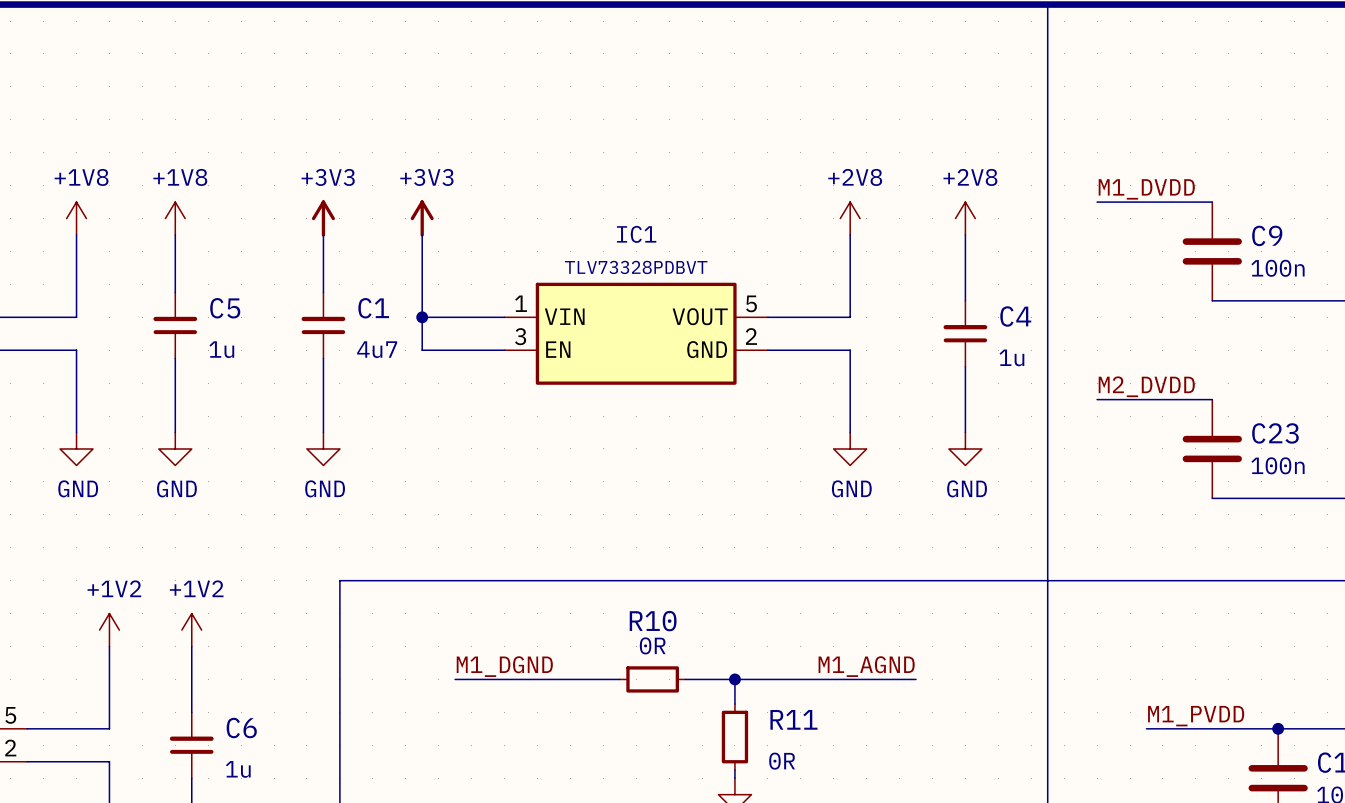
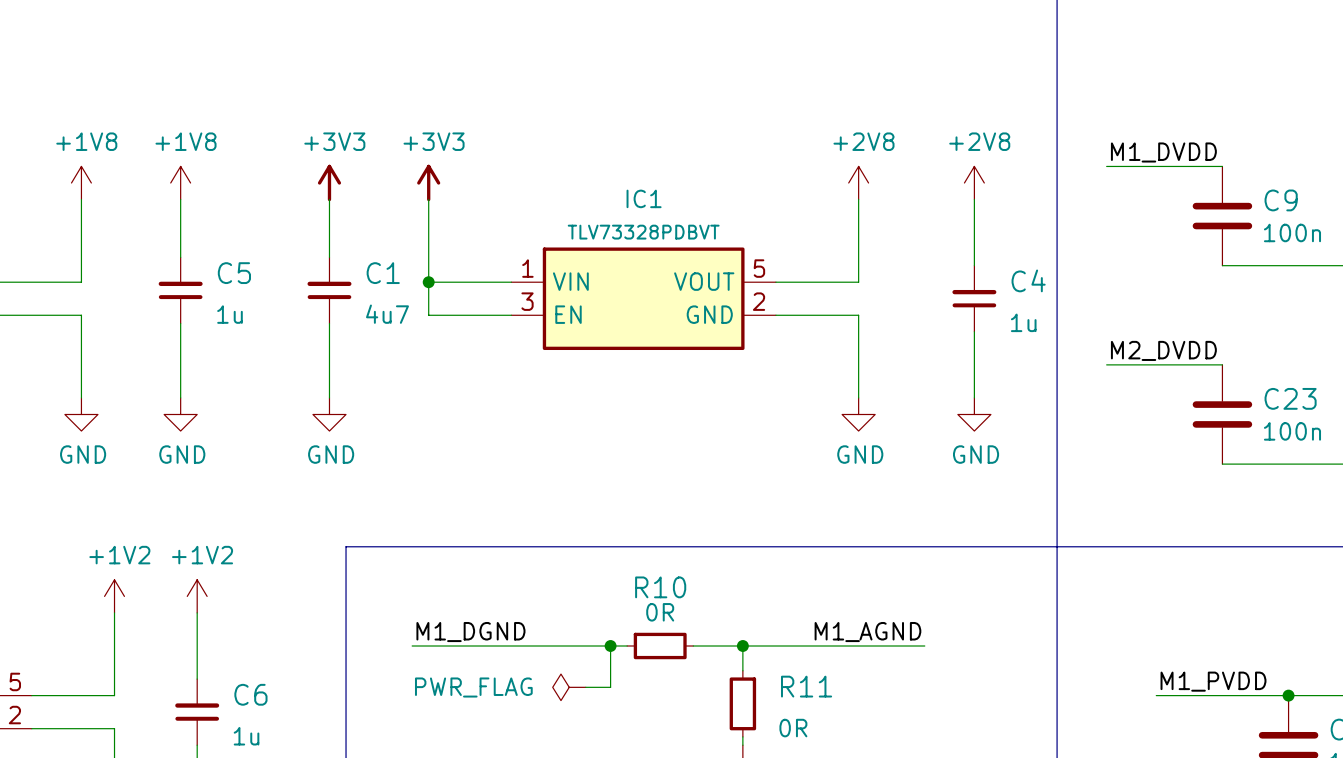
label position: M1_DGND (504, 666) -> M1_DGND (470, 632)
wire: none -> (412, 646) (461, 646)
wire: none -> (610, 646) (610, 687) (585, 687)
junction: none -> (610, 646)
power symbol: none -> PWR_FLAG (569, 687)

